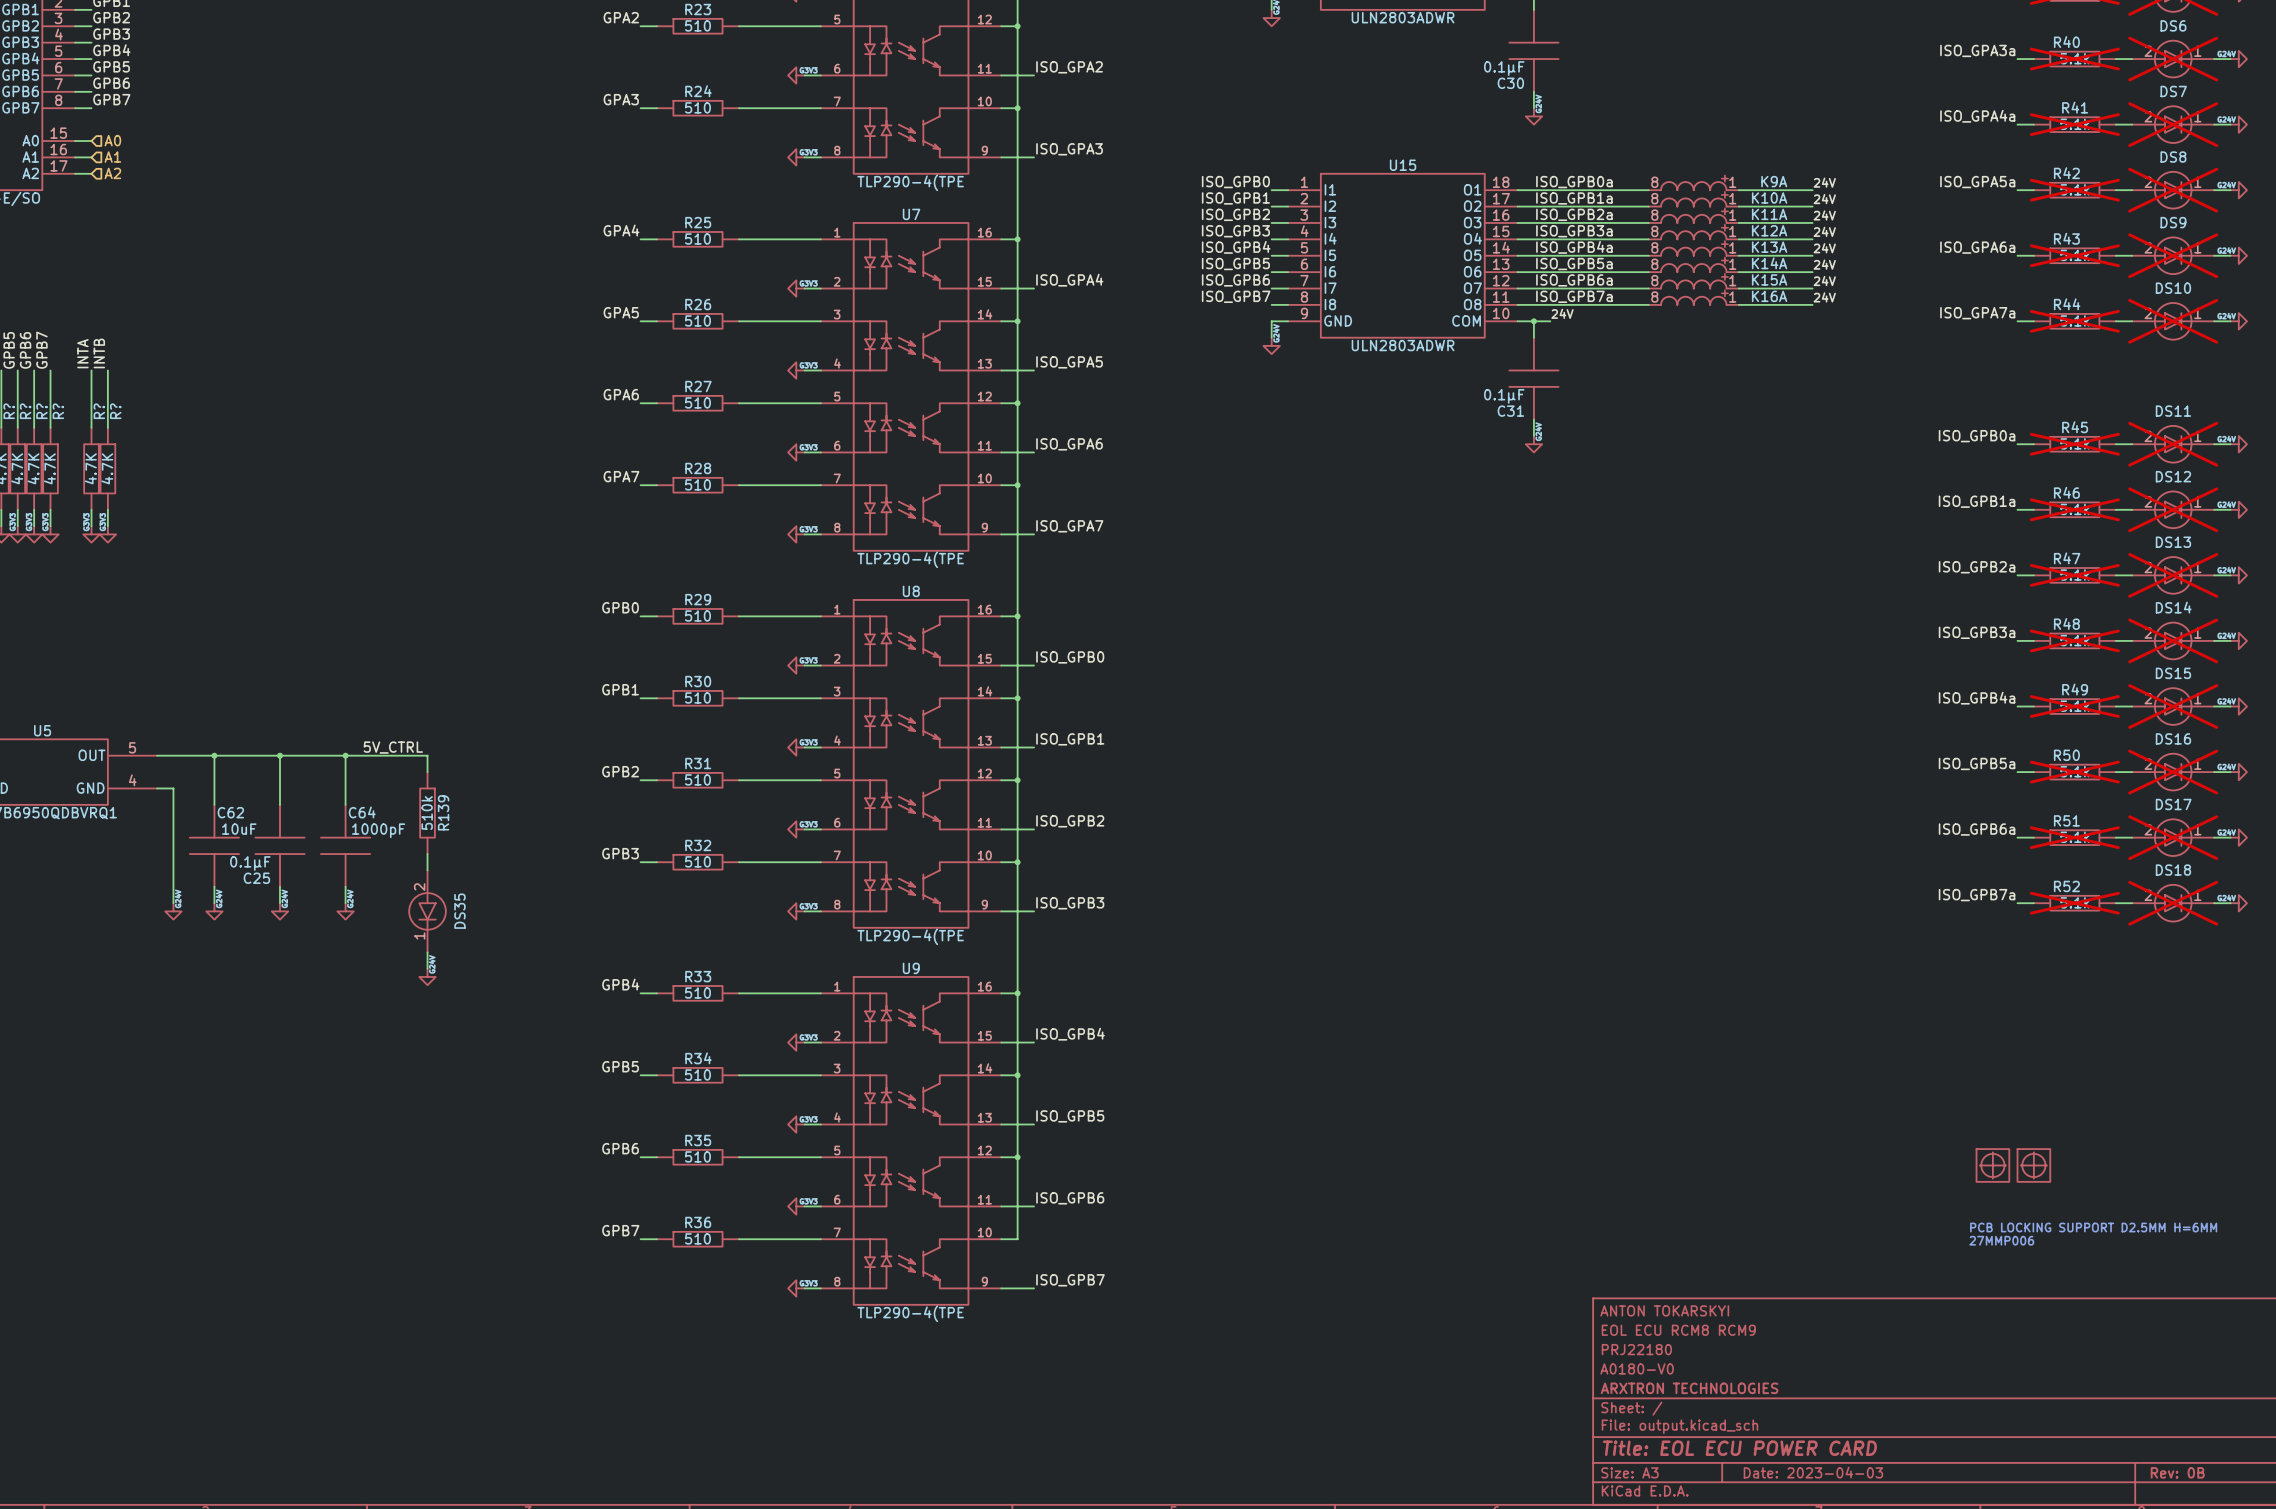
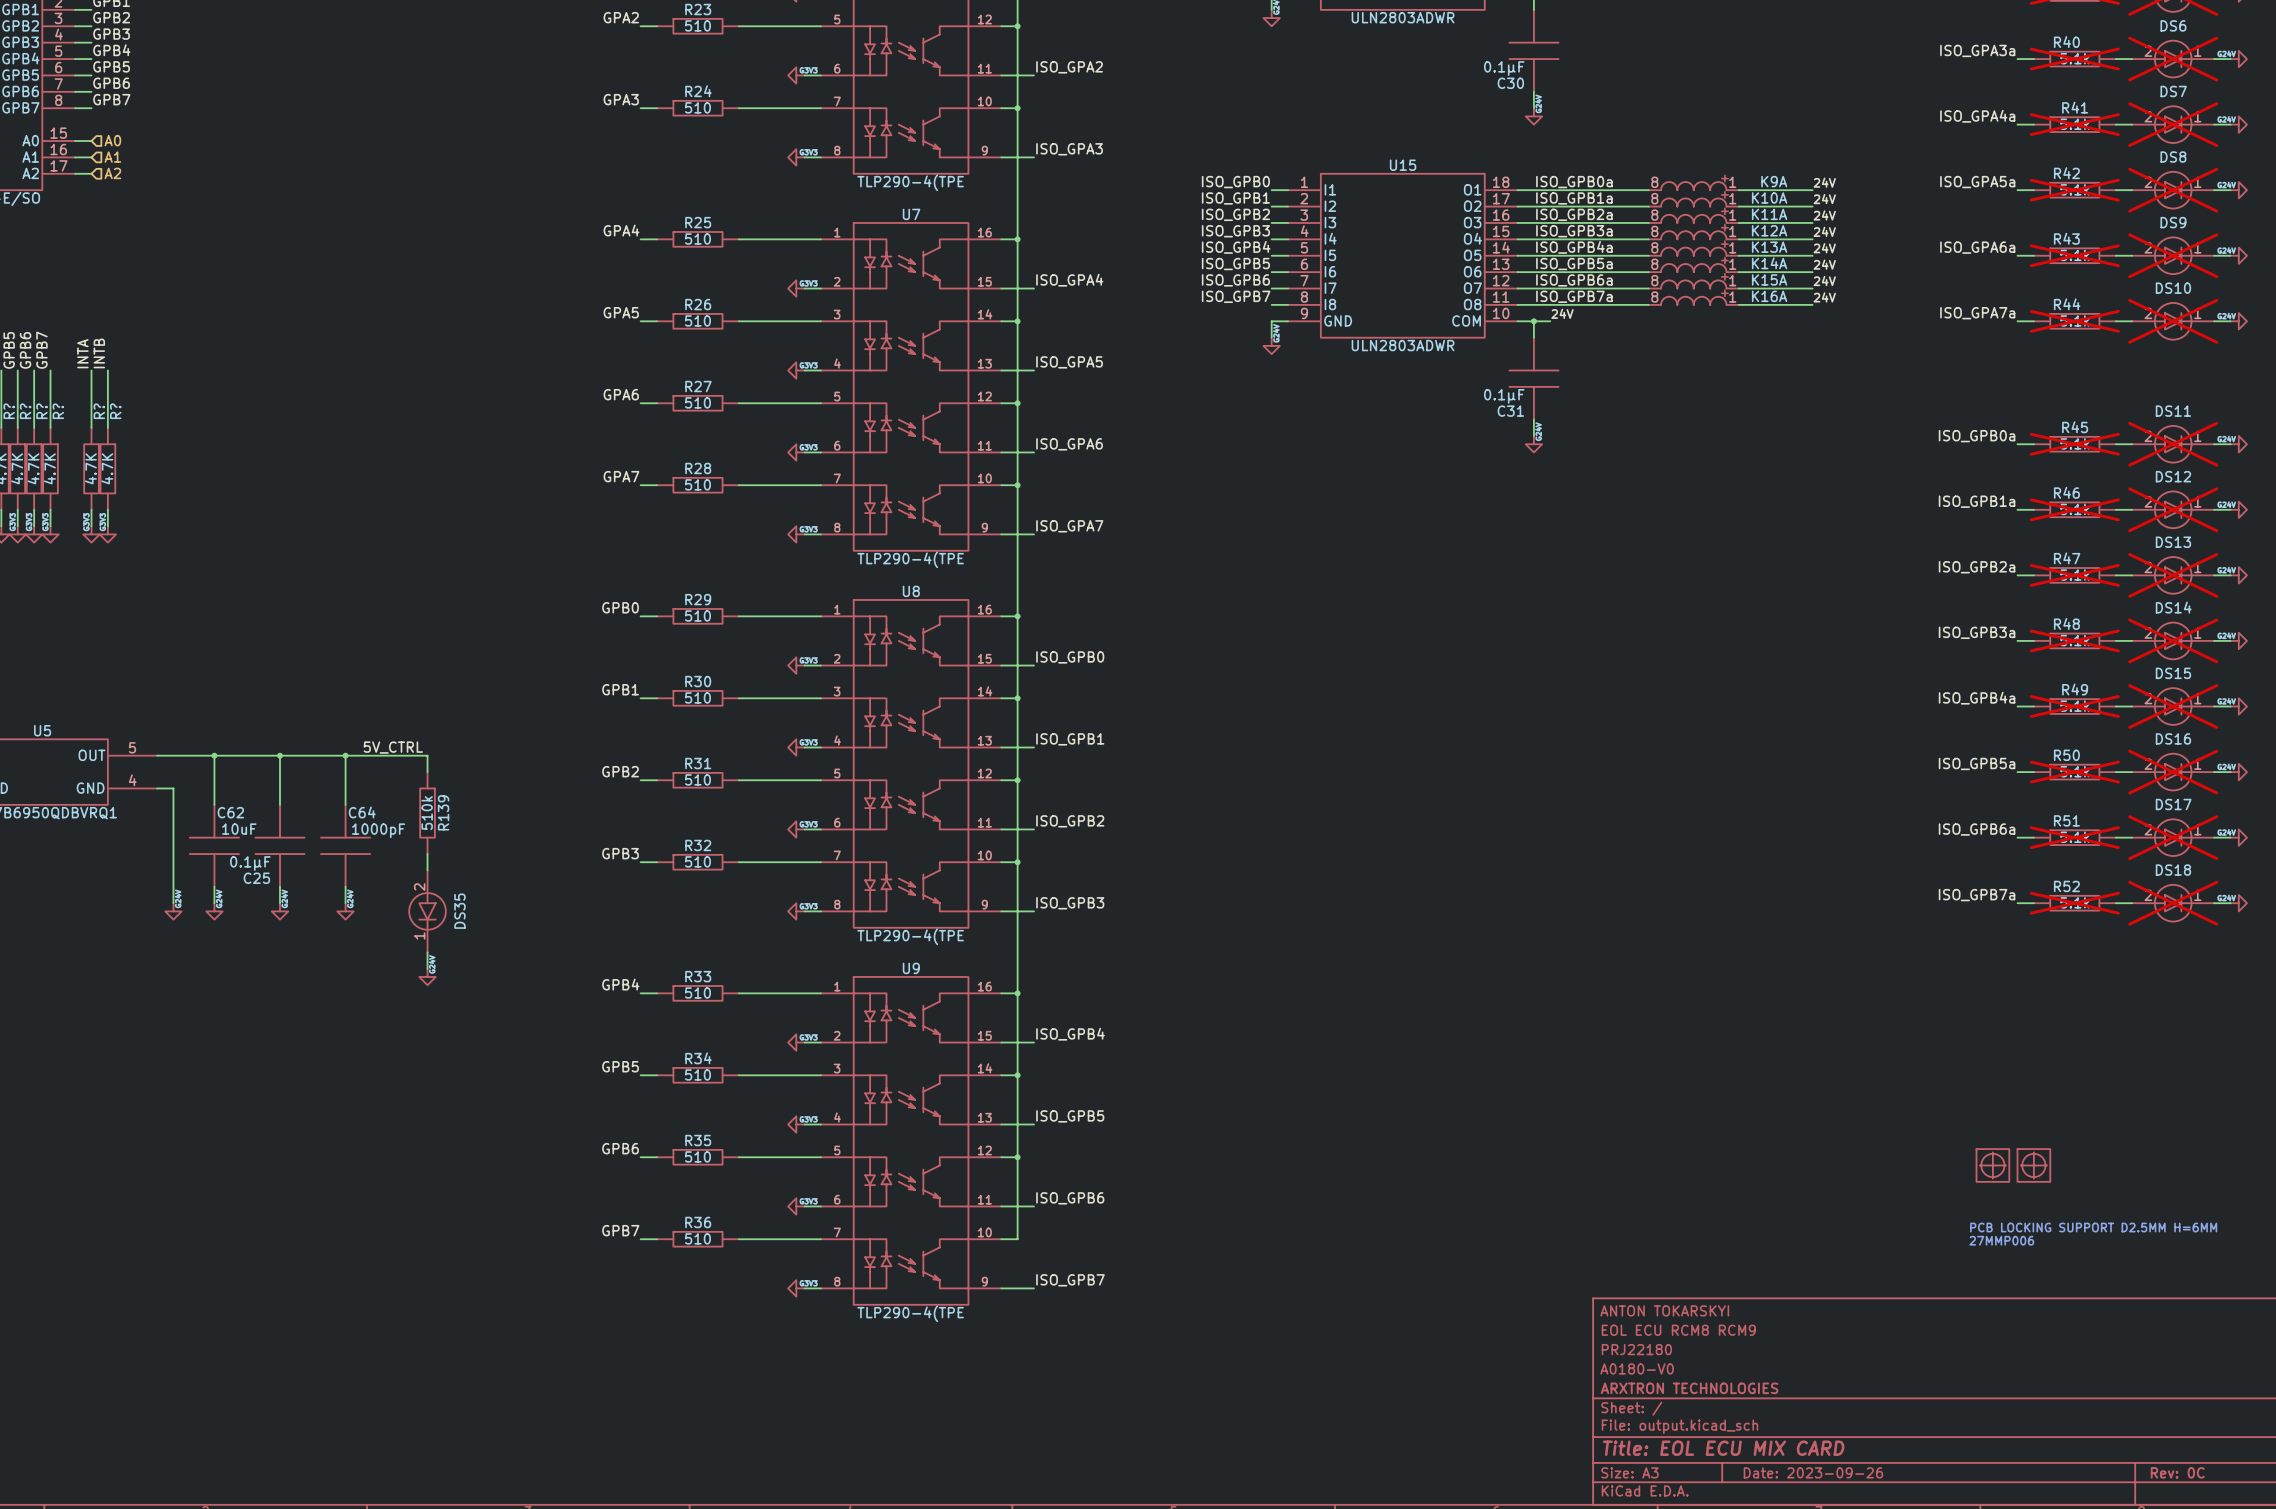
title block: Title: EOL ECU POWER CARD (1739, 1448) -> Title: EOL ECU MIX CARD (1723, 1448)
title block: Date: 2023-04-03 (1813, 1472) -> Date: 2023-09-26 (1813, 1472)
title block: Rev: 0B (2177, 1472) -> Rev: 0C (2177, 1472)

